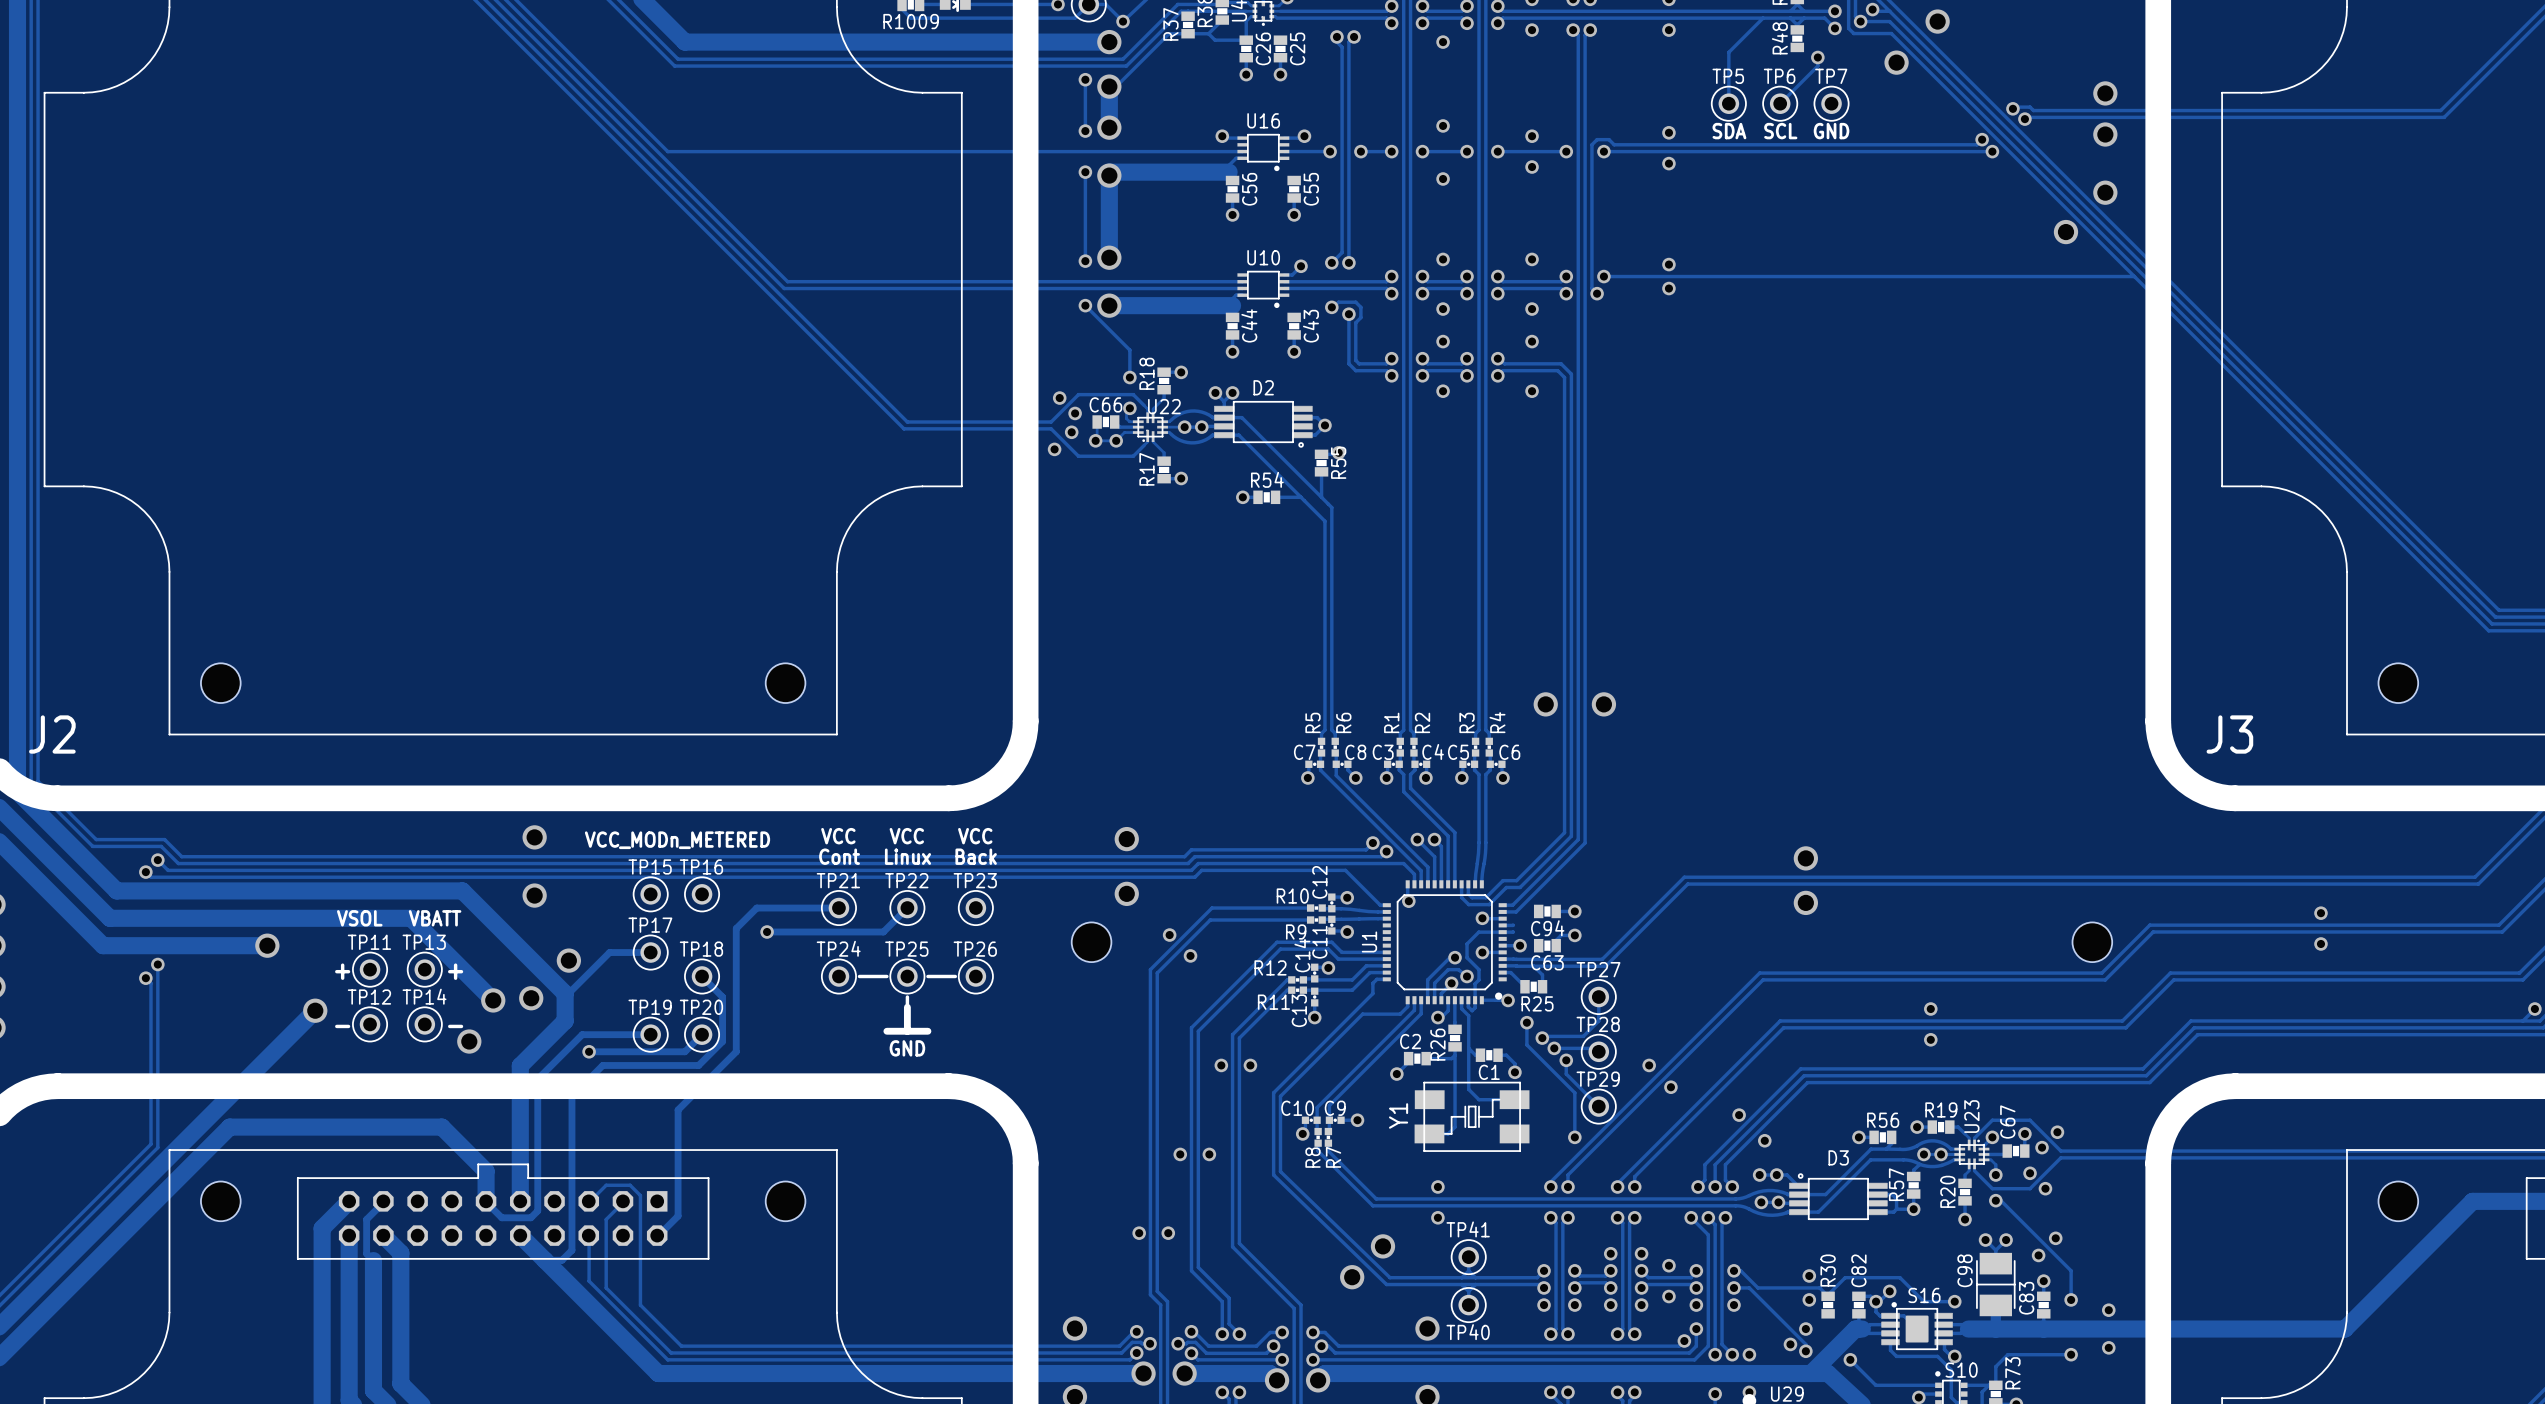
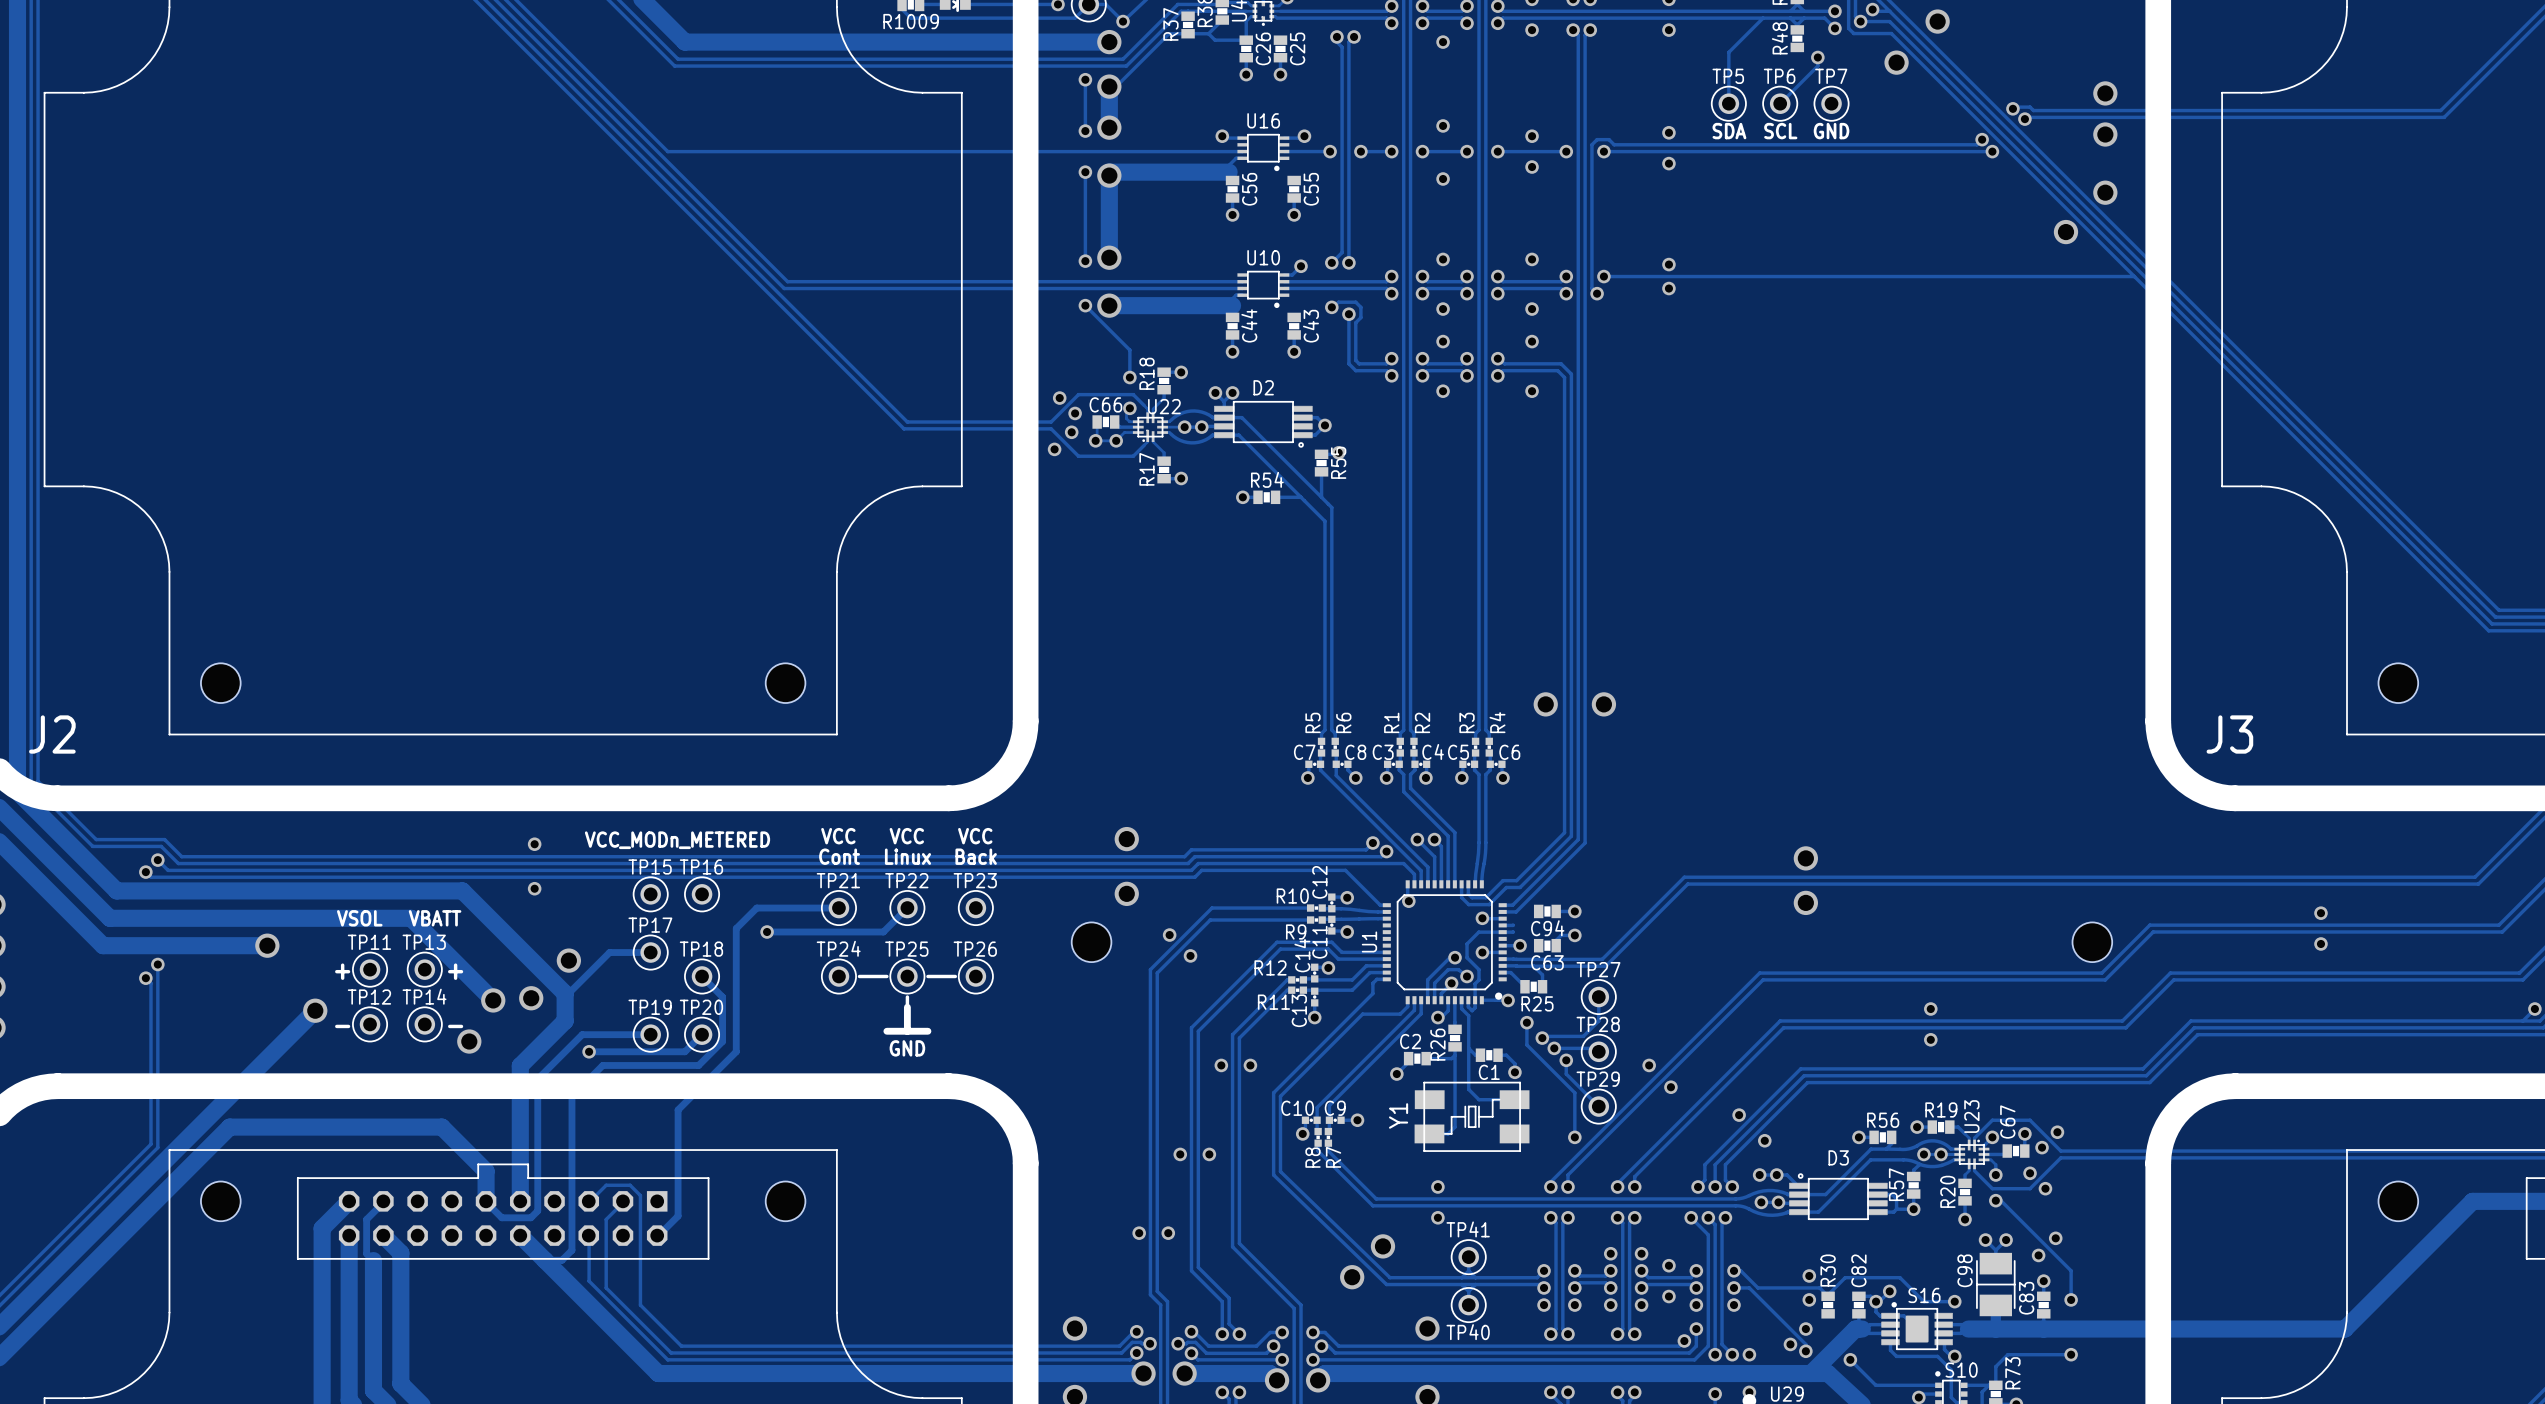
via size: [522, 825, 547, 850] -> [527, 837, 542, 852]
via size: [522, 883, 547, 908] -> [527, 881, 542, 896]
via: (2108, 1310) -> none
via: (2108, 1347) -> none

